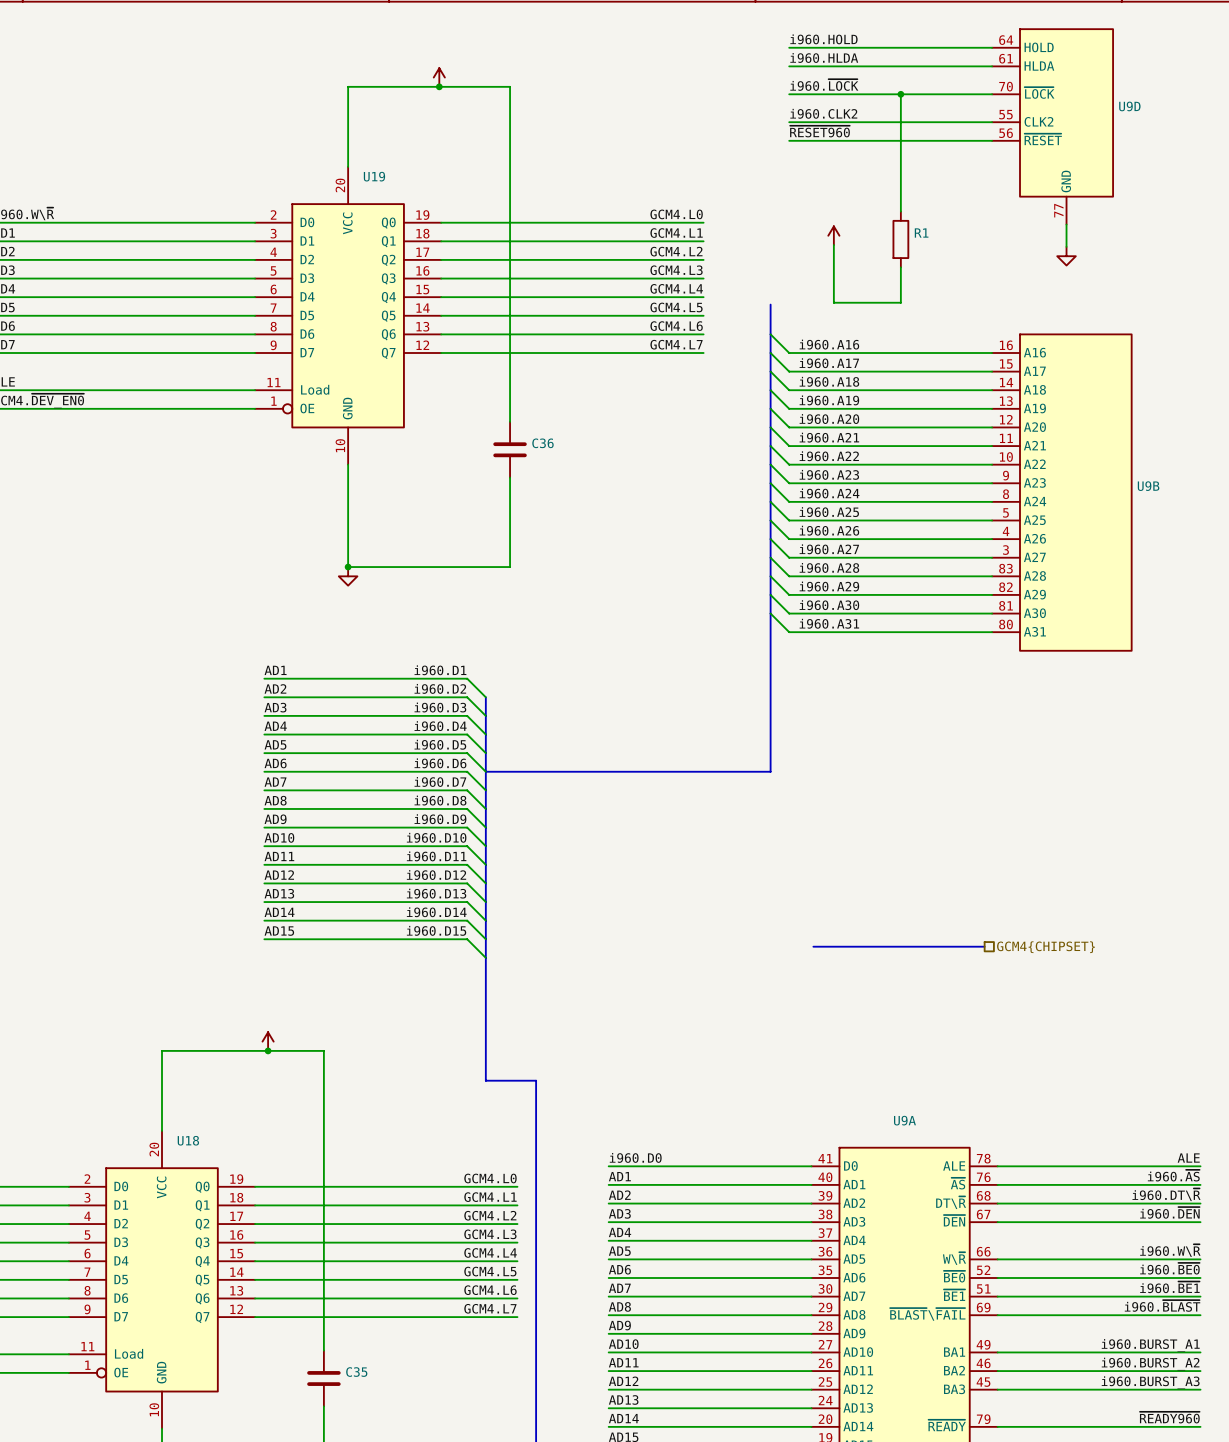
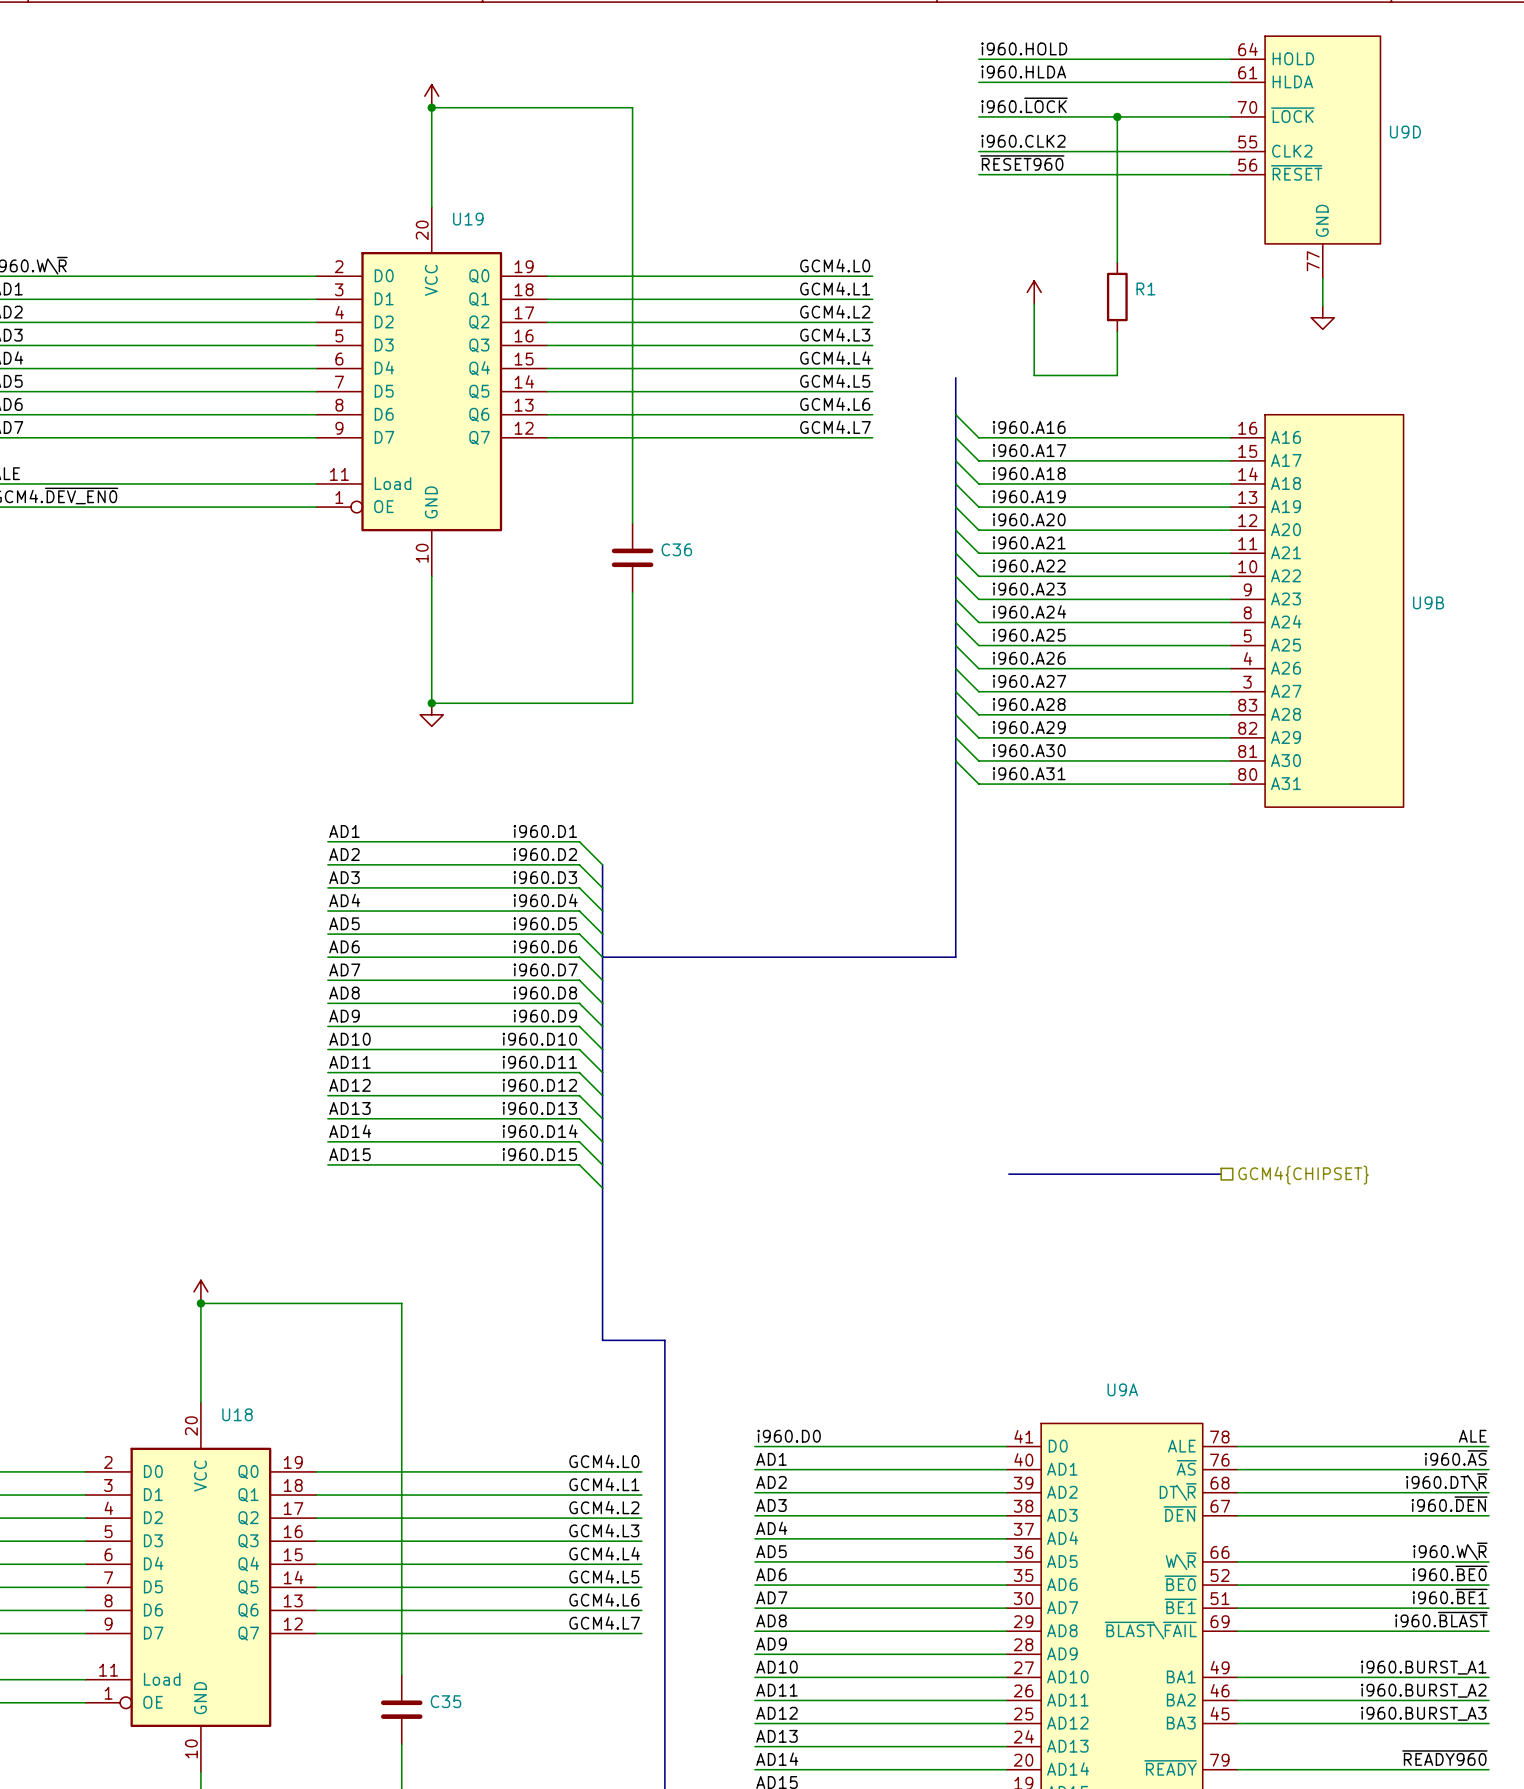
power symbol position: (439, 77) -> (431, 96)
junction: none -> (431, 107)
junction: (439, 86) -> none
power symbol position: (268, 1041) -> (200, 1291)
junction: none -> (200, 1303)
junction: (268, 1050) -> none

